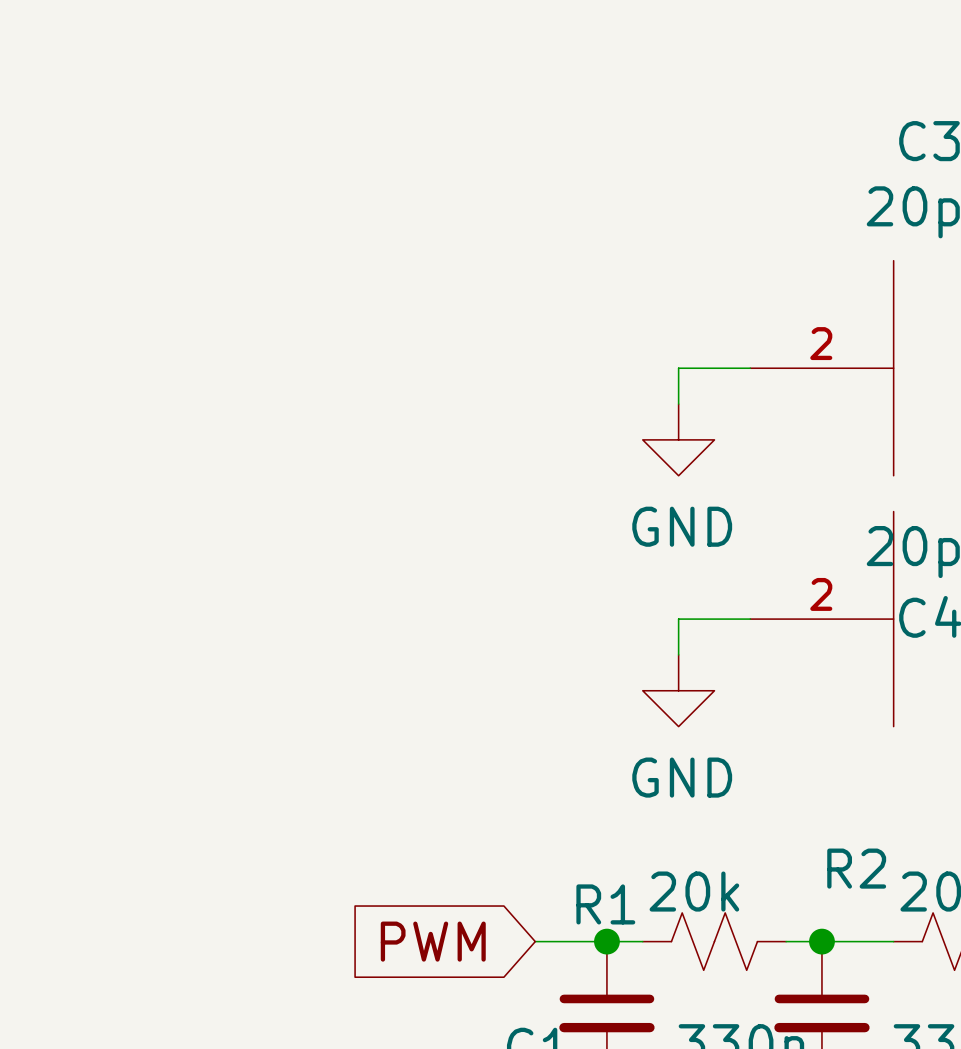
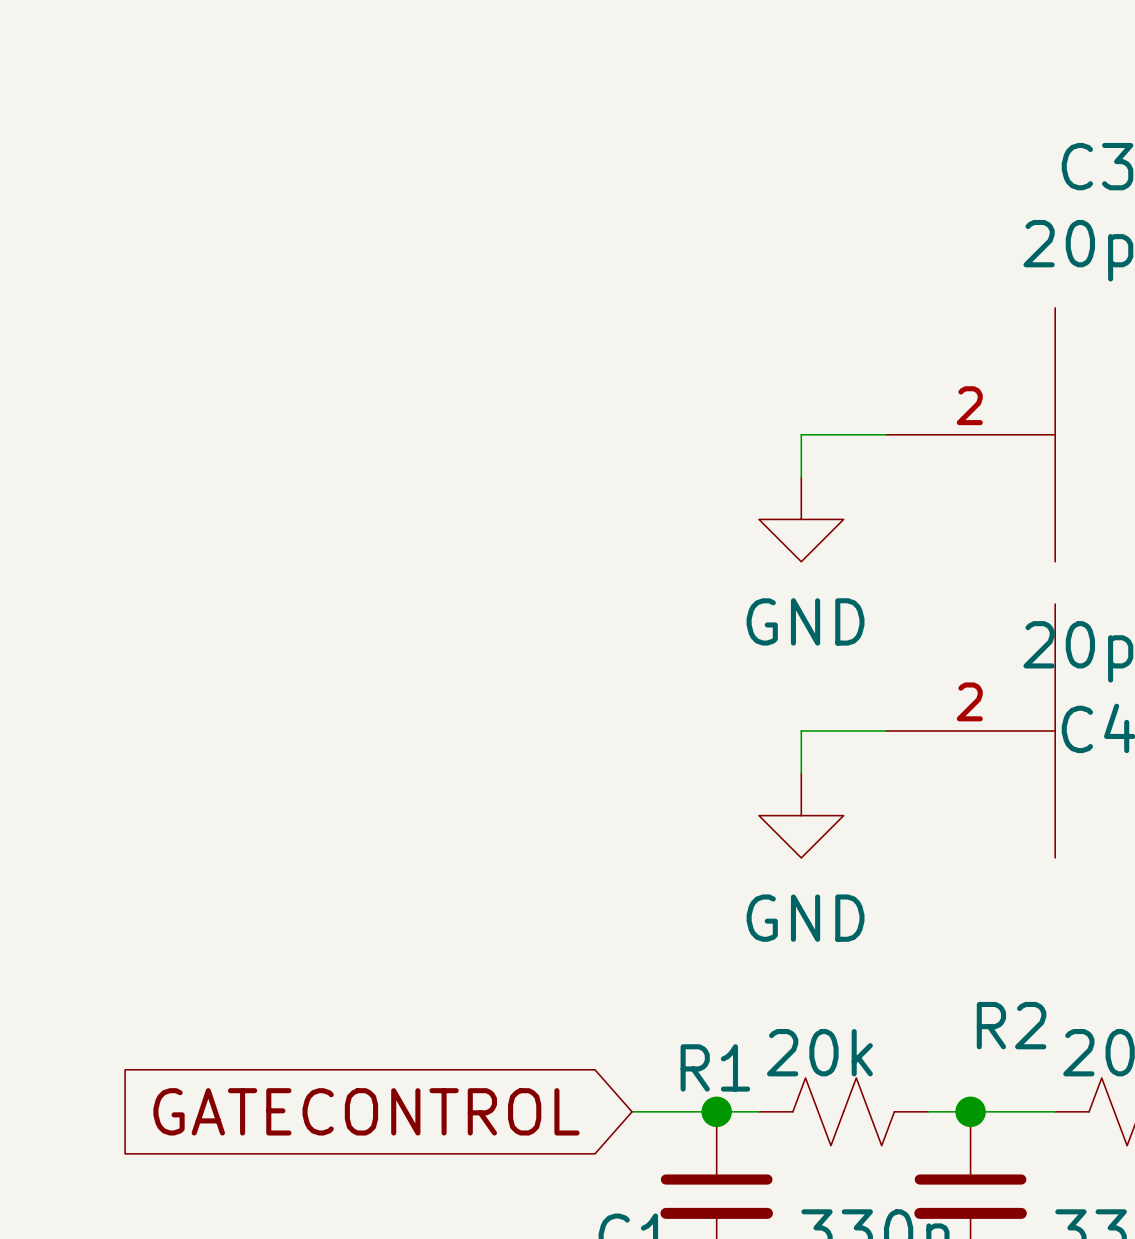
global label: PWM (433, 941) -> GATECONTROL (366, 1111)

